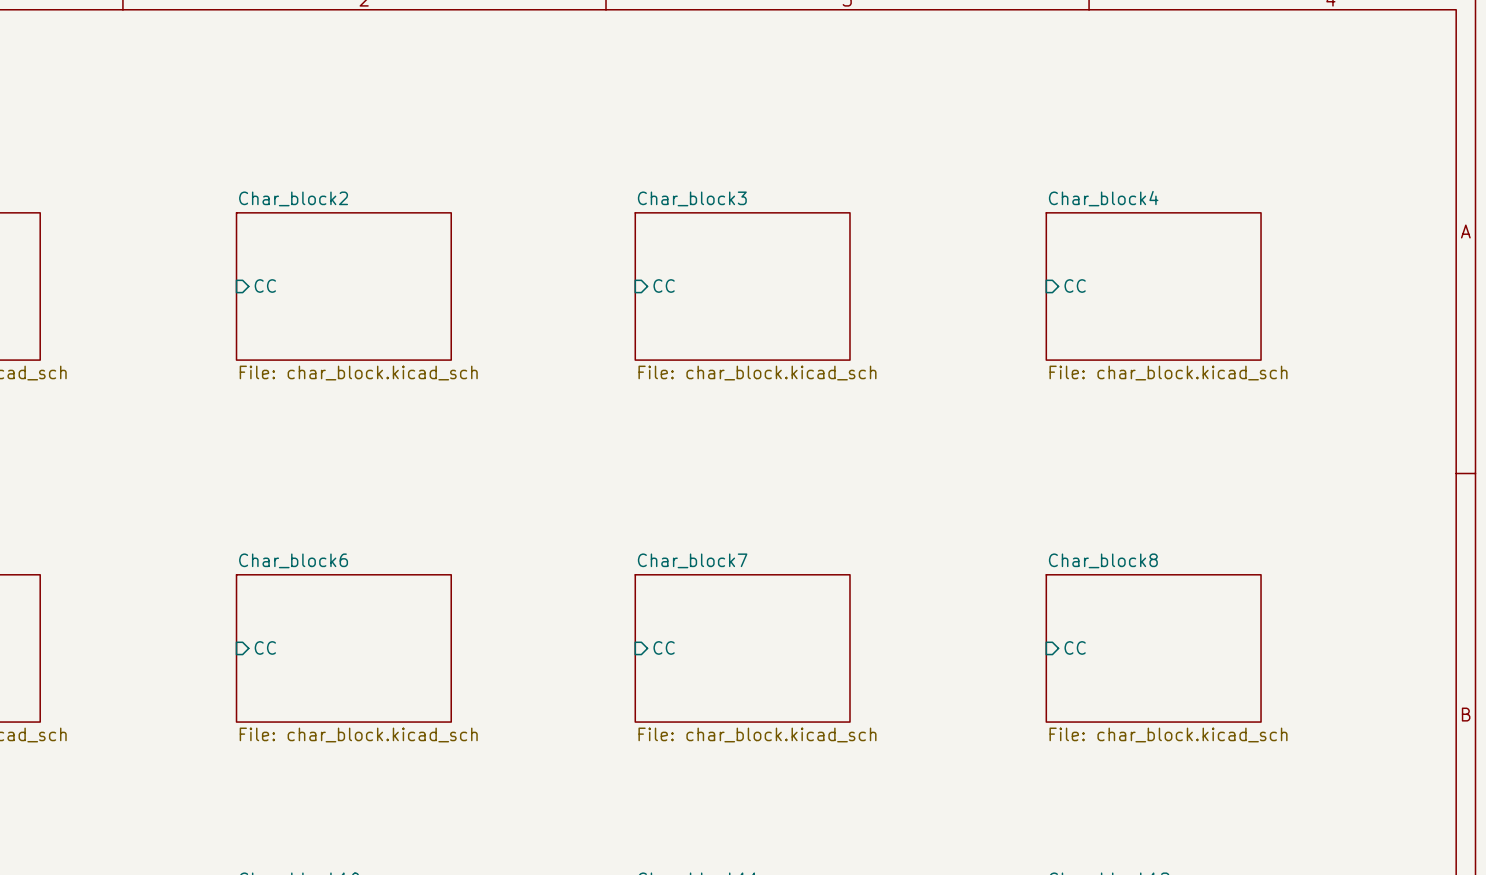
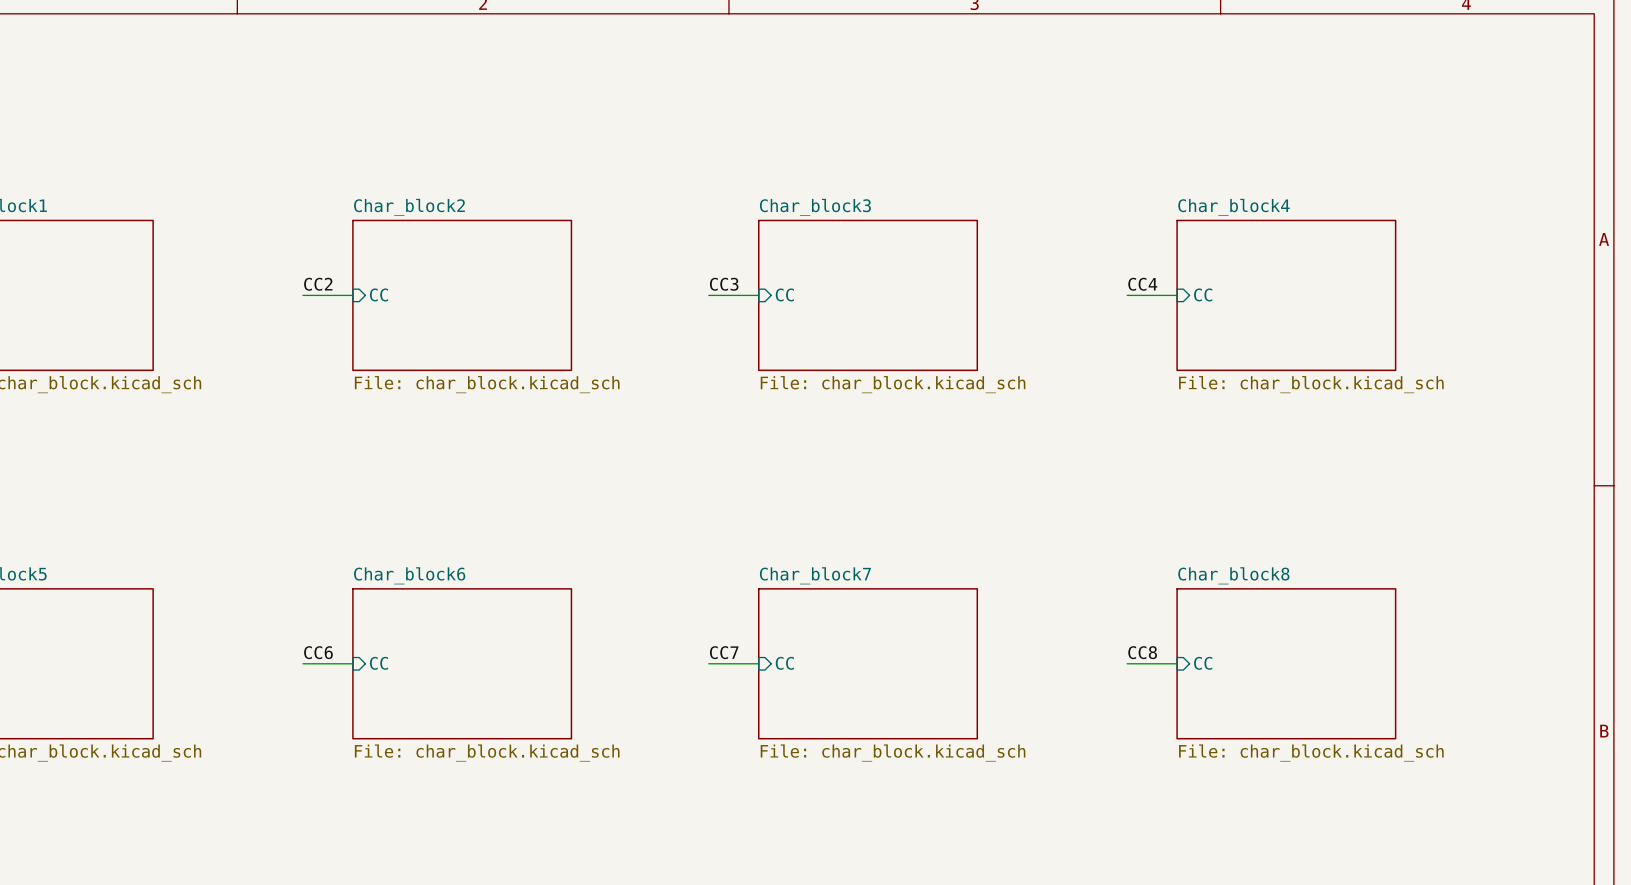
label: none -> CC2 (318, 284)
label: none -> CC3 (724, 284)
label: none -> CC4 (1142, 284)
wire: none -> (302, 295) (352, 295)
wire: none -> (708, 295) (758, 295)
wire: none -> (1127, 295) (1177, 295)
label: none -> CC6 (318, 652)
label: none -> CC7 (724, 652)
label: none -> CC8 (1142, 652)
wire: none -> (302, 663) (352, 663)
wire: none -> (708, 663) (758, 663)
wire: none -> (1127, 663) (1177, 663)

